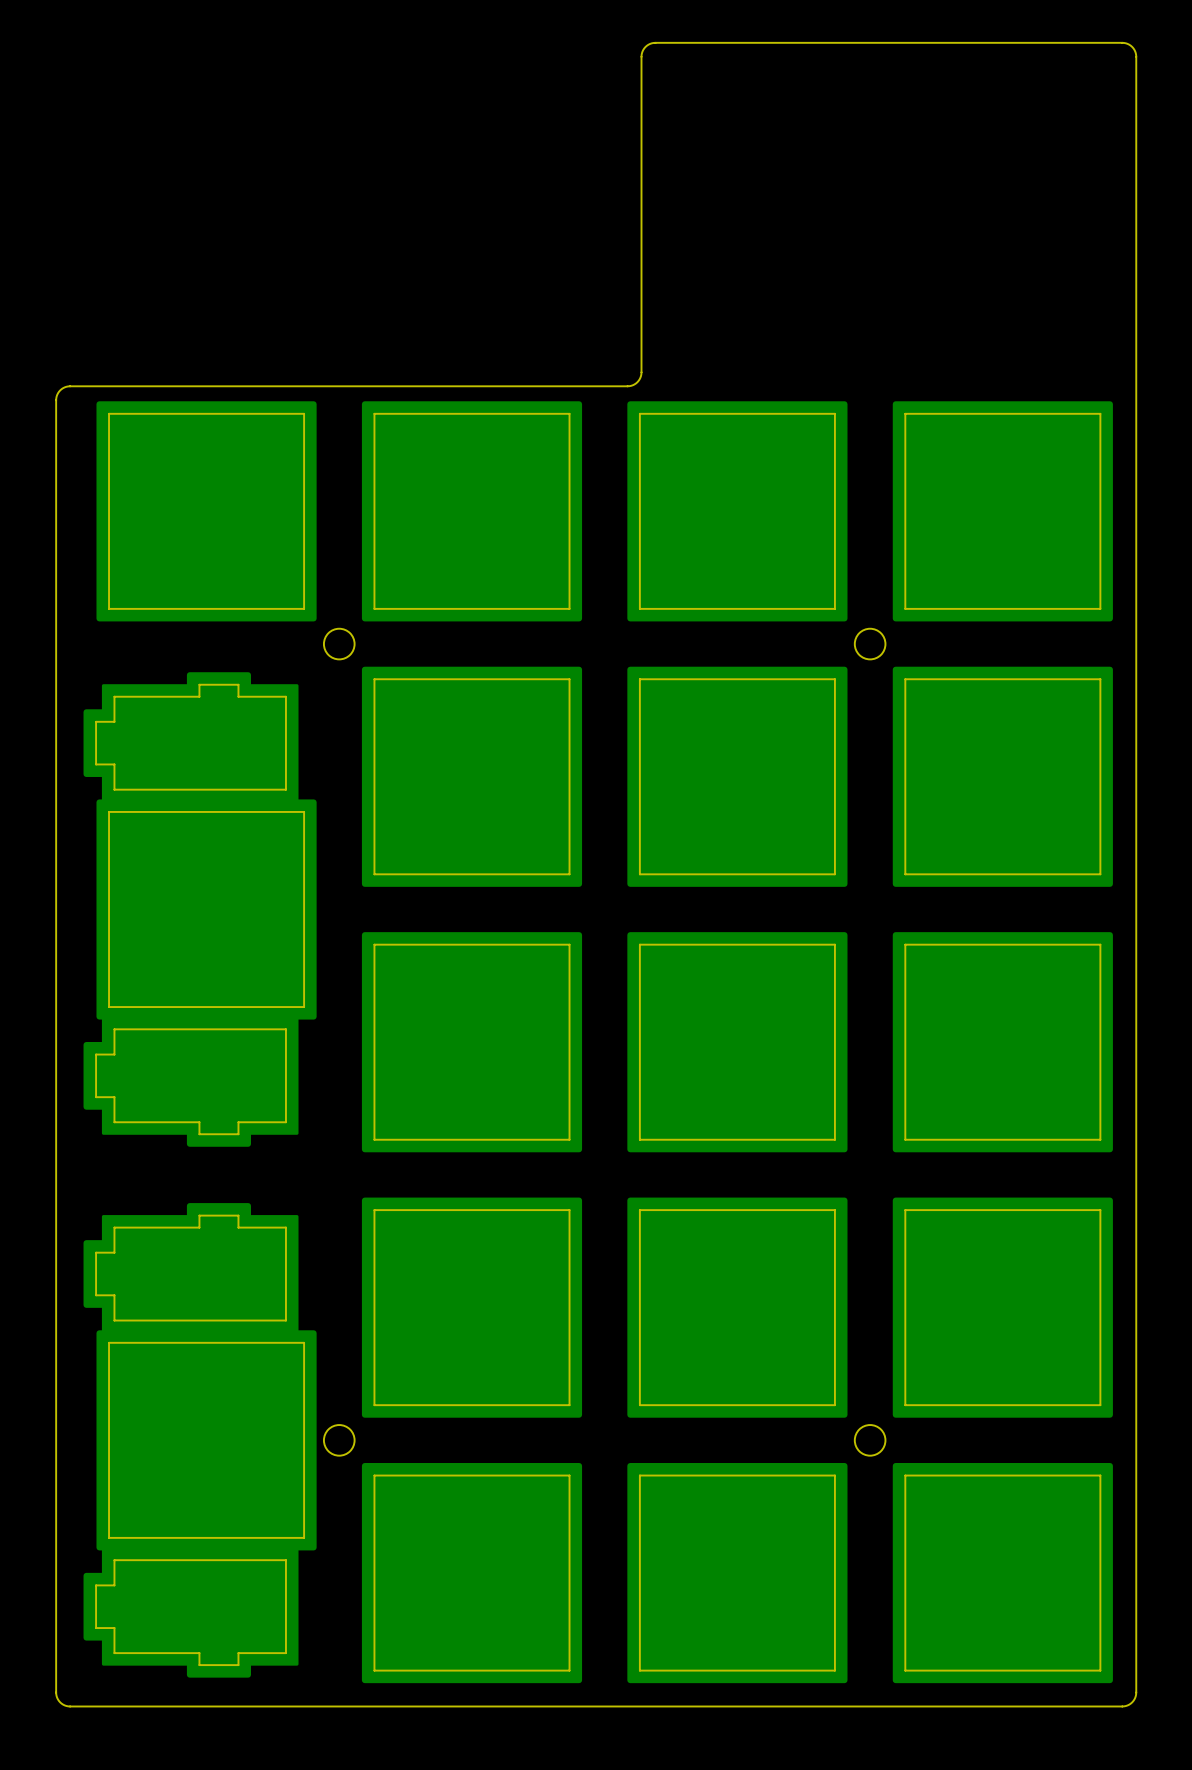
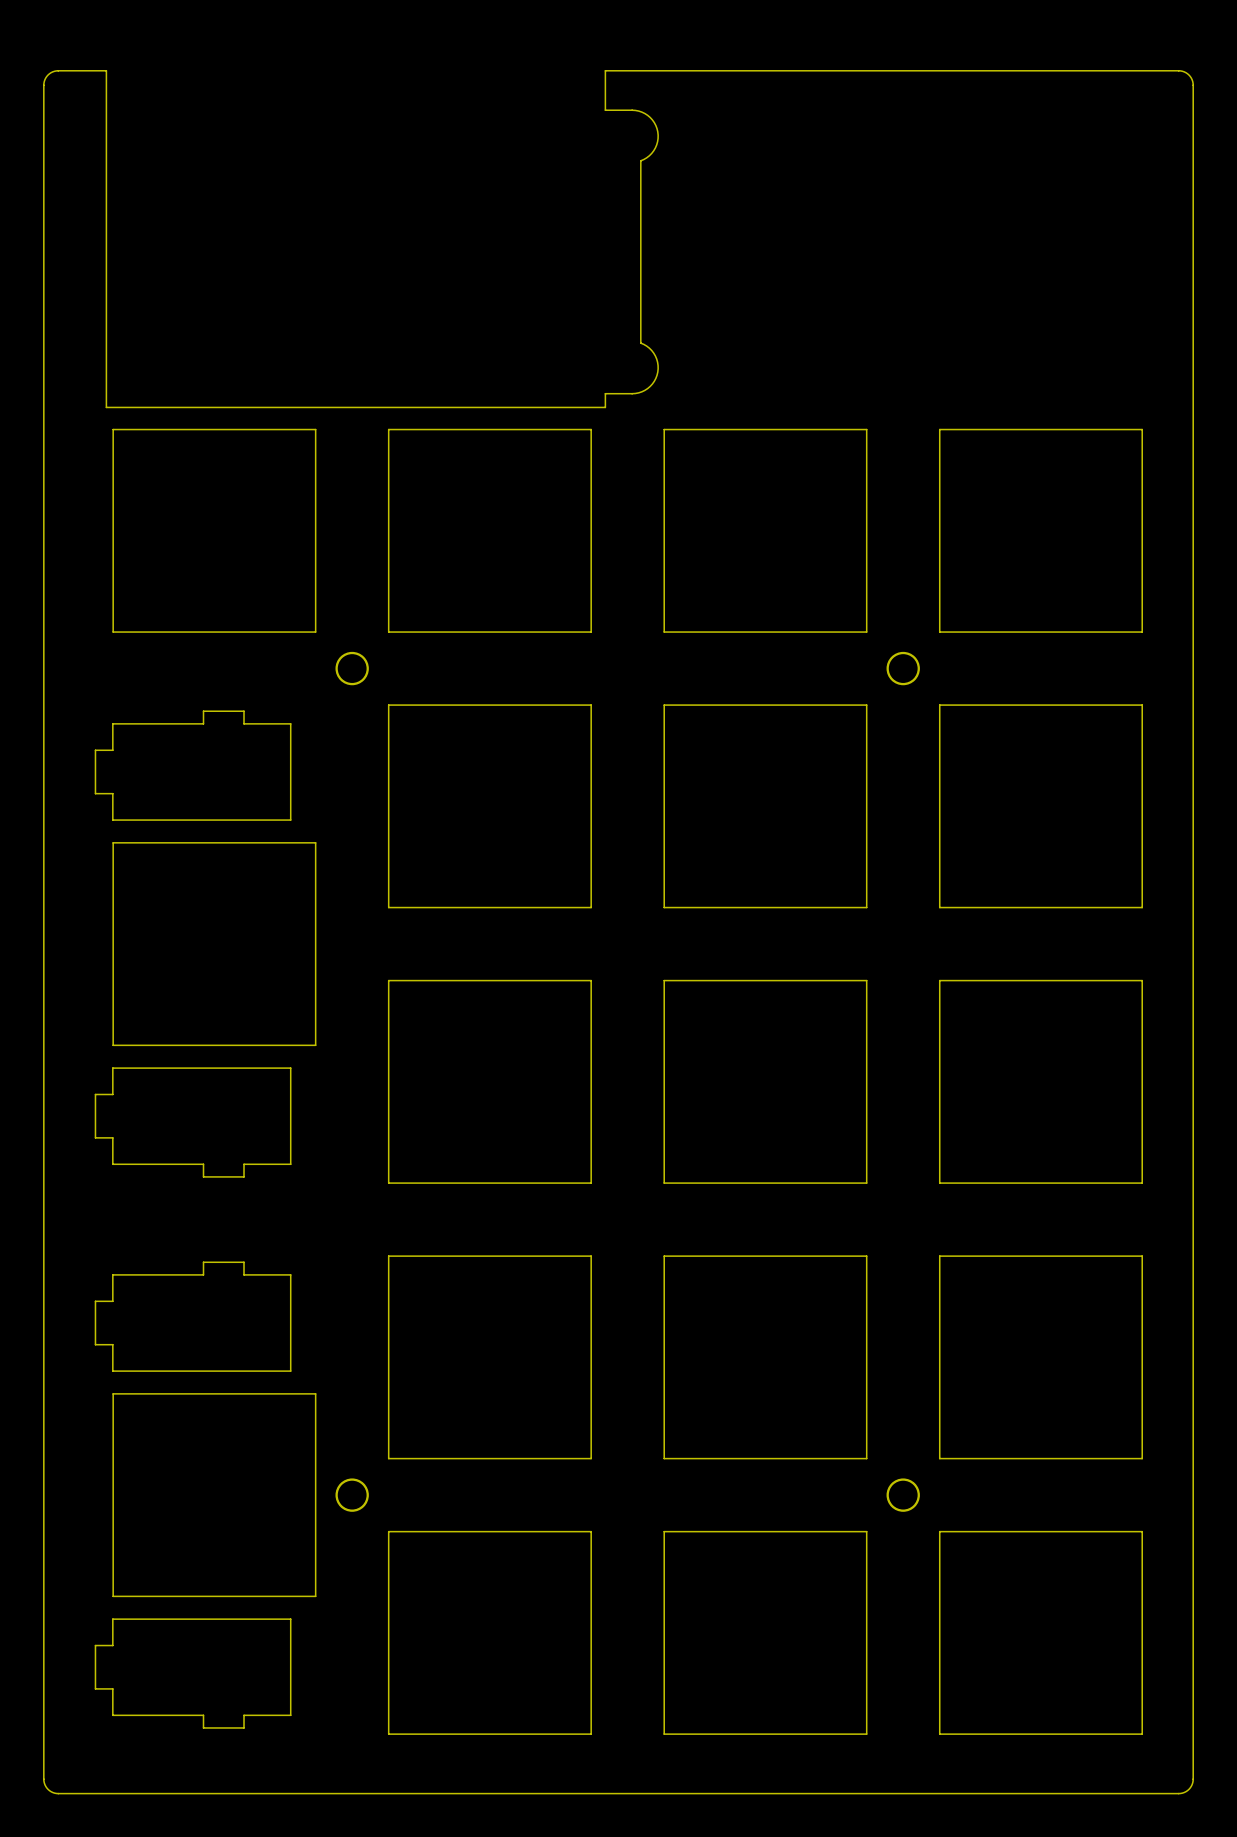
board edge: (1122, 42) (655, 42) (646, 45) (641, 56) (641, 372) (638, 380) (631, 385) (70, 386) (63, 388) (58, 393) (56, 400) (56, 1692) (58, 1699) (63, 1704) (70, 1706) (1122, 1706) (1129, 1704) (1134, 1699) (1136, 1692) (1136, 56) (1132, 46) (1122, 42) -> (58, 70) (48, 75) (43, 85) (43, 1779) (45, 1786) (51, 1791) (58, 1793) (1178, 1793) (1185, 1791) (1191, 1786) (1193, 1779) (1193, 85) (1191, 78) (1185, 72) (1178, 70) (605, 70) (605, 110) (641, 112) (652, 119) (657, 131) (657, 141) (653, 150) (640, 160) (640, 343) (651, 350) (658, 365) (655, 378) (647, 388) (635, 393) (605, 393) (605, 407) (106, 407) (106, 70) (58, 70)
drawing: none -> [113, 429, 316, 633]
drawing: none -> [388, 429, 592, 633]
drawing: none -> [664, 429, 867, 633]
drawing: none -> [939, 429, 1143, 633]
part: (206, 511) -> none
part: (471, 511) -> none
part: (737, 511) -> none
part: (1002, 511) -> none
round board edge: none -> [336, 653, 368, 684]
round board edge: none -> [887, 653, 919, 684]
drawing: none -> [388, 705, 592, 908]
drawing: none -> [664, 705, 867, 908]
drawing: none -> [939, 705, 1143, 908]
drawing: none -> [95, 711, 316, 1178]
part: (471, 776) -> none
part: (737, 776) -> none
part: (1002, 776) -> none
part: (200, 909) -> none
drawing: none -> [388, 980, 592, 1184]
drawing: none -> [664, 980, 867, 1184]
drawing: none -> [939, 980, 1143, 1184]
part: (471, 1042) -> none
part: (737, 1042) -> none
part: (1002, 1042) -> none
drawing: none -> [388, 1256, 592, 1459]
drawing: none -> [664, 1256, 867, 1459]
drawing: none -> [939, 1256, 1143, 1459]
drawing: none -> [95, 1262, 316, 1729]
part: (471, 1307) -> none
part: (737, 1307) -> none
part: (1002, 1307) -> none
round board edge: none -> [336, 1479, 368, 1511]
round board edge: none -> [887, 1479, 919, 1511]
part: (200, 1440) -> none
drawing: none -> [388, 1531, 592, 1735]
drawing: none -> [664, 1531, 867, 1735]
drawing: none -> [939, 1531, 1143, 1735]
part: (471, 1573) -> none
part: (737, 1573) -> none
part: (1002, 1573) -> none

